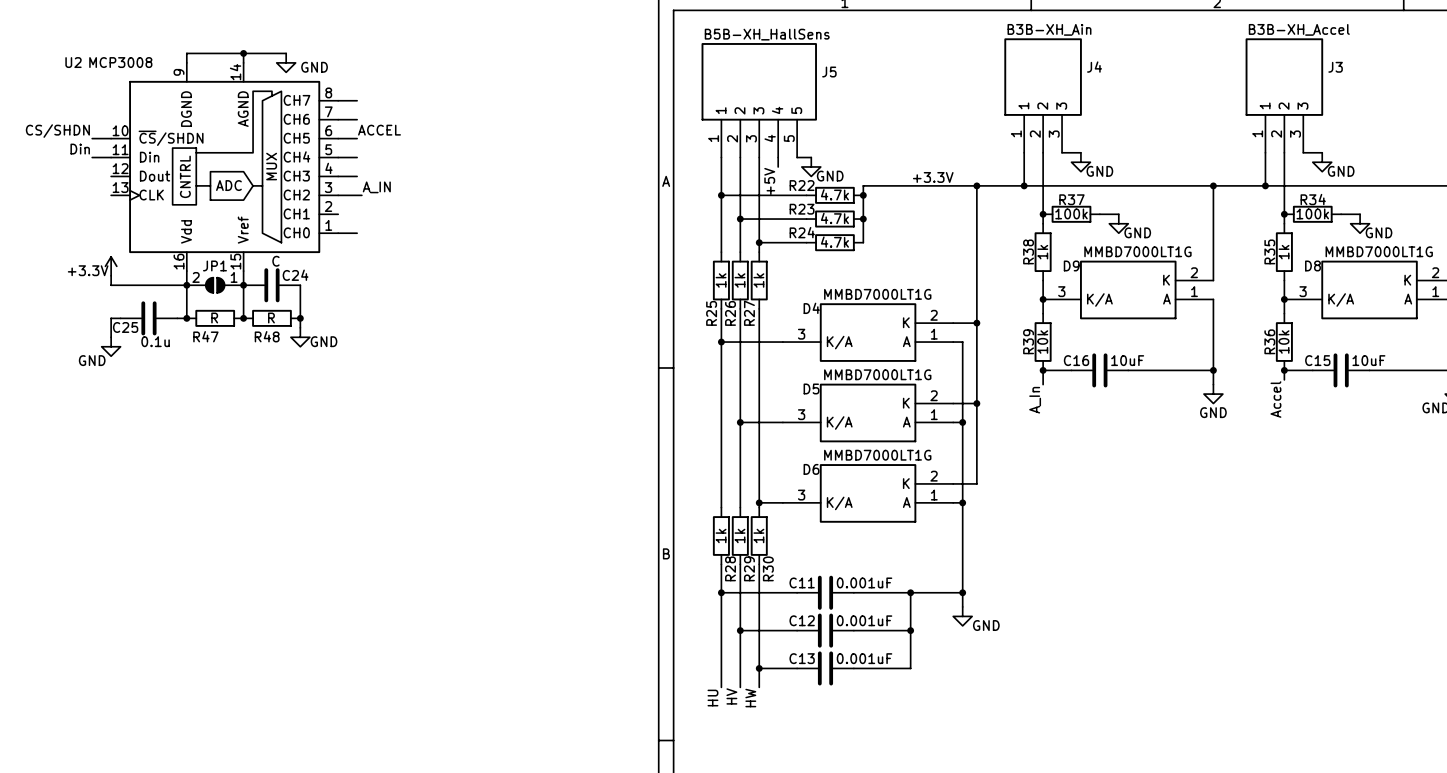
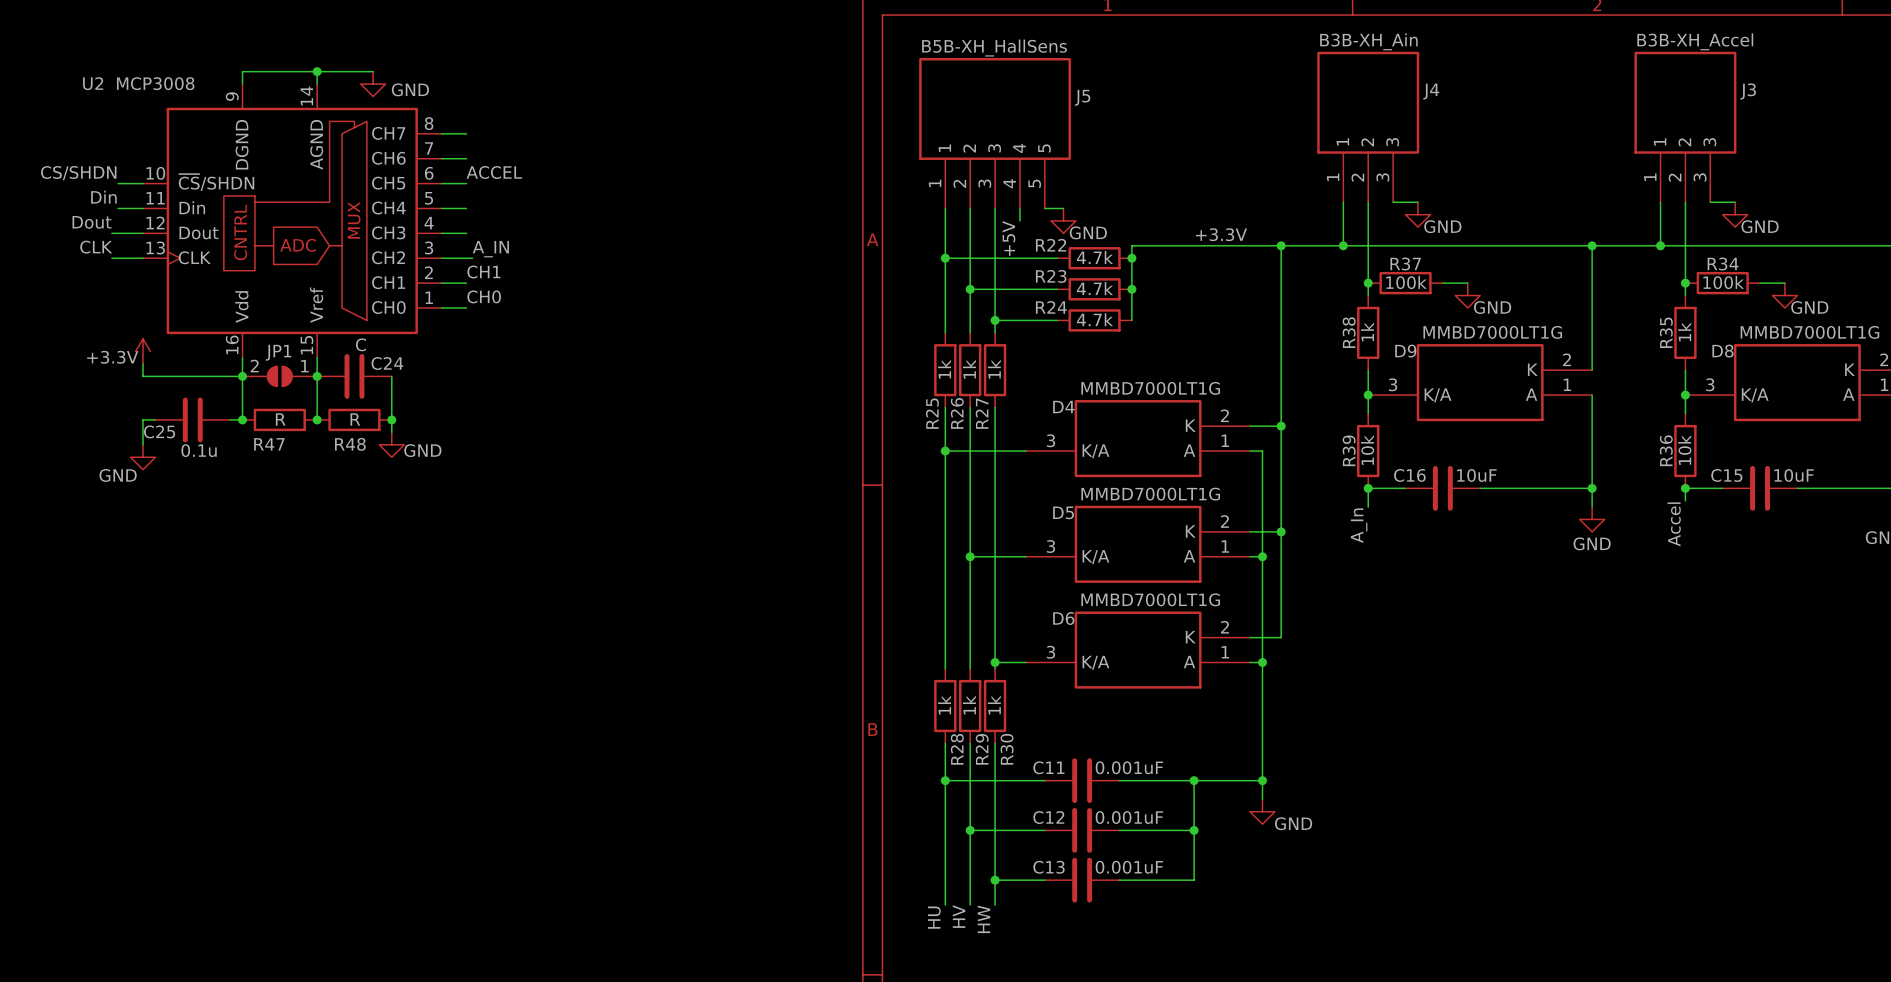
label: none -> Dout (92, 222)
wire: none -> (111, 233) (143, 233)
label: none -> CLK (96, 247)
wire: none -> (111, 258) (143, 258)
label: none -> CH1 (483, 272)
wire: none -> (441, 283) (466, 283)
label: none -> CH0 (484, 296)

